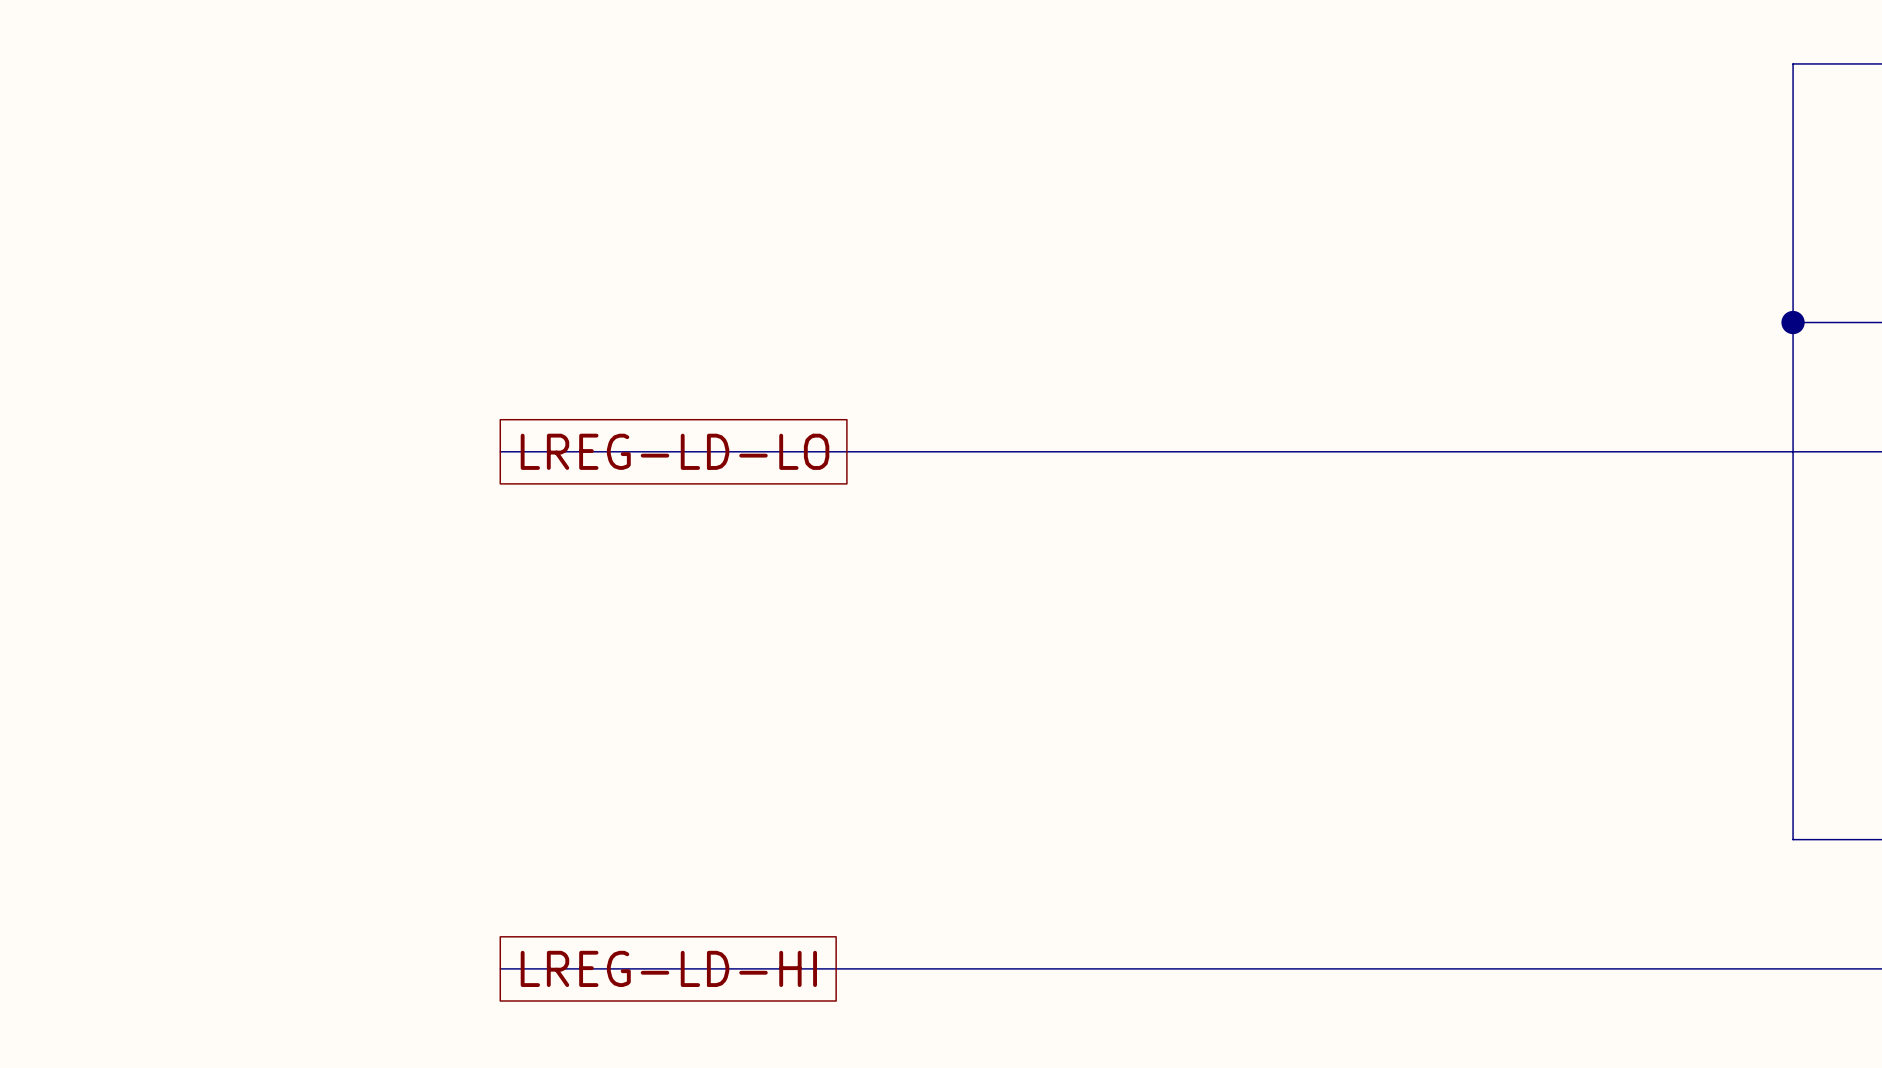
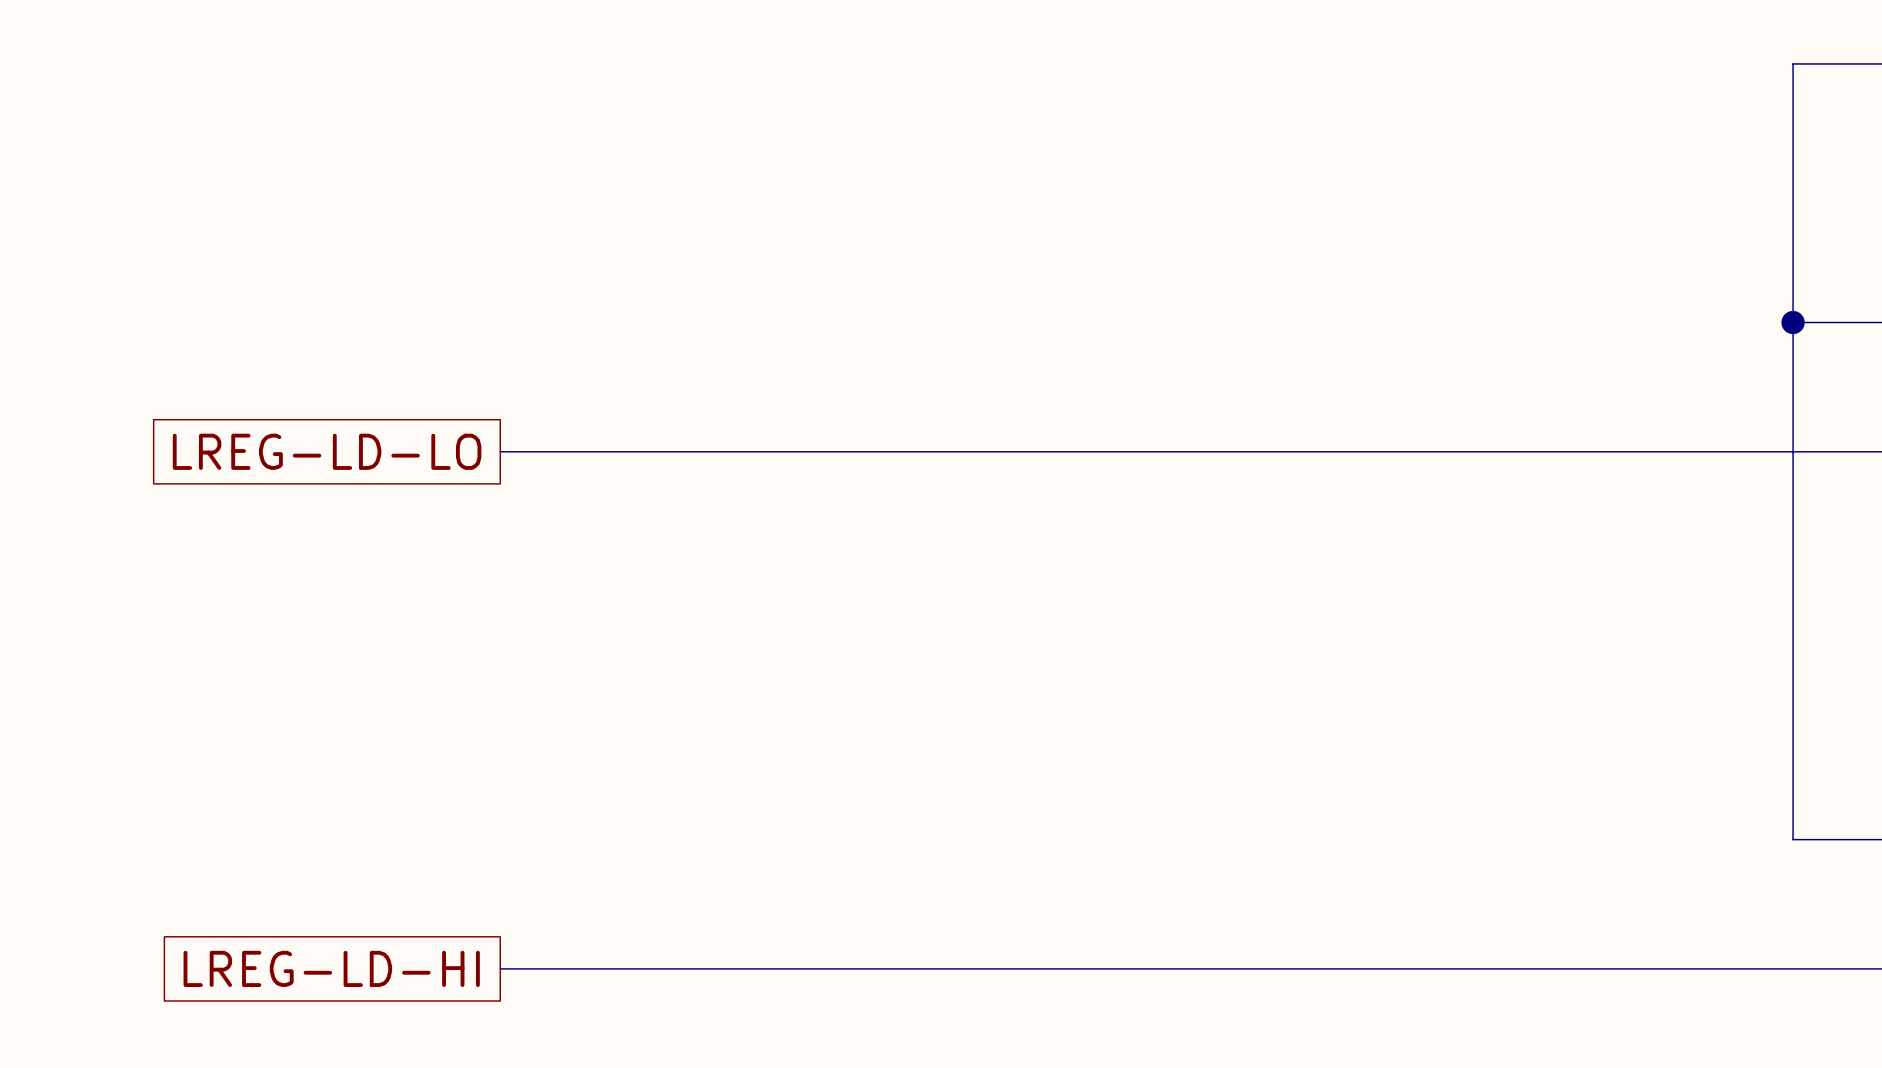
global label rotation: 0° (675, 451) -> 180° (327, 451)
global label rotation: 0° (668, 968) -> 180° (331, 968)

